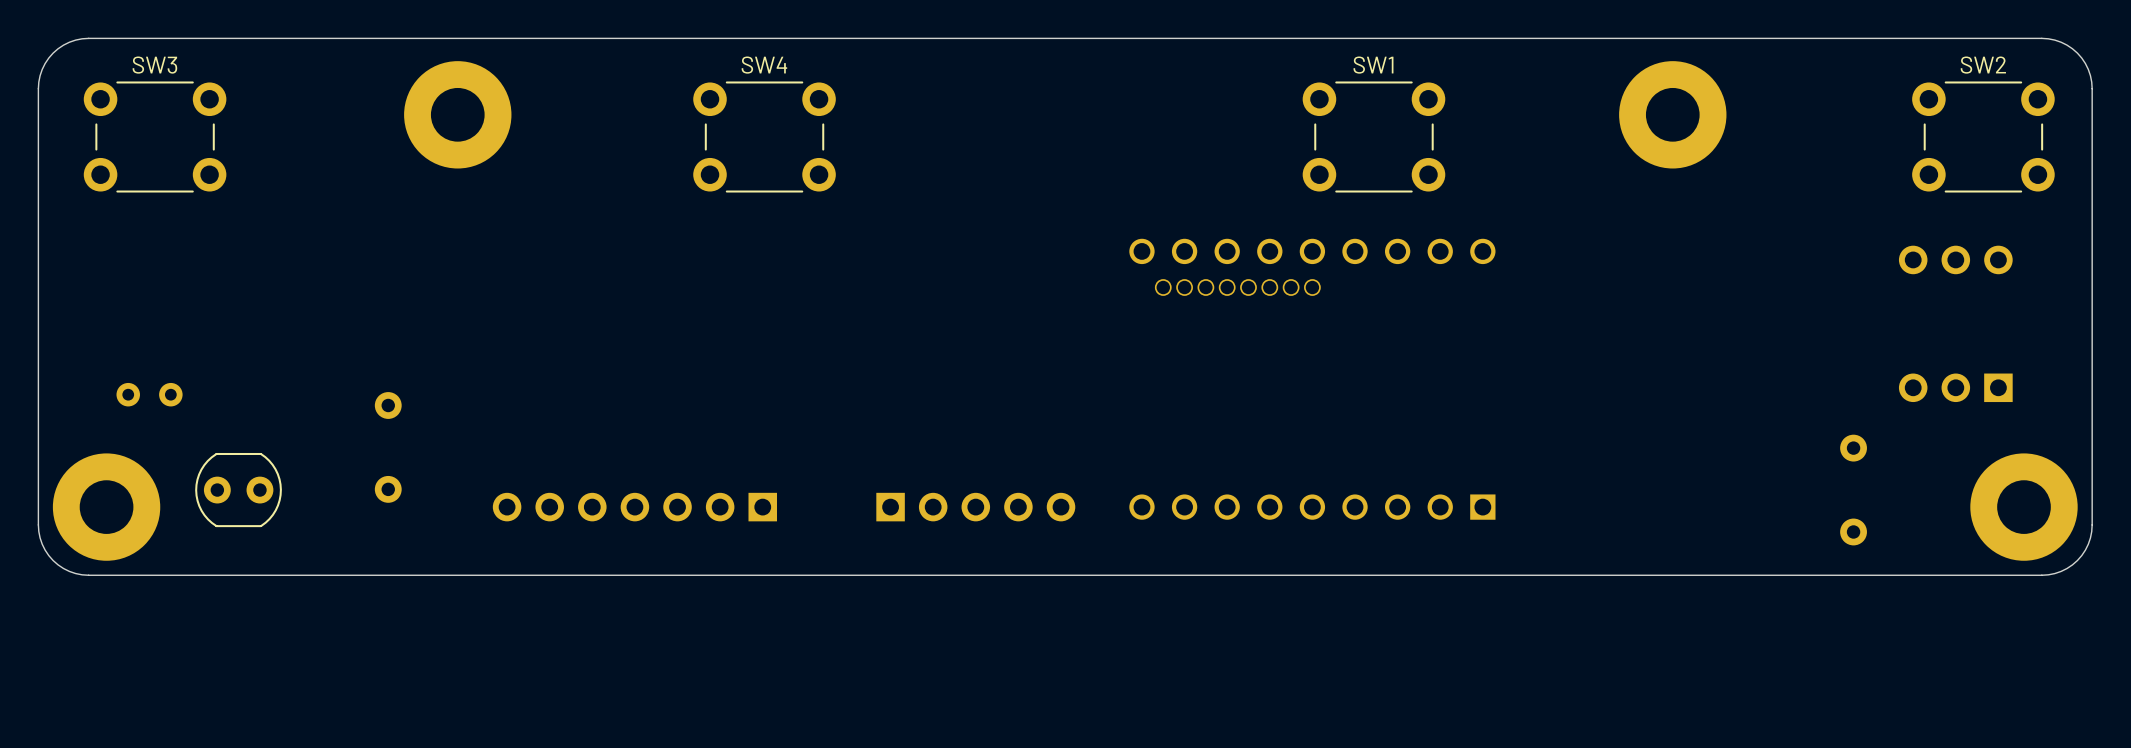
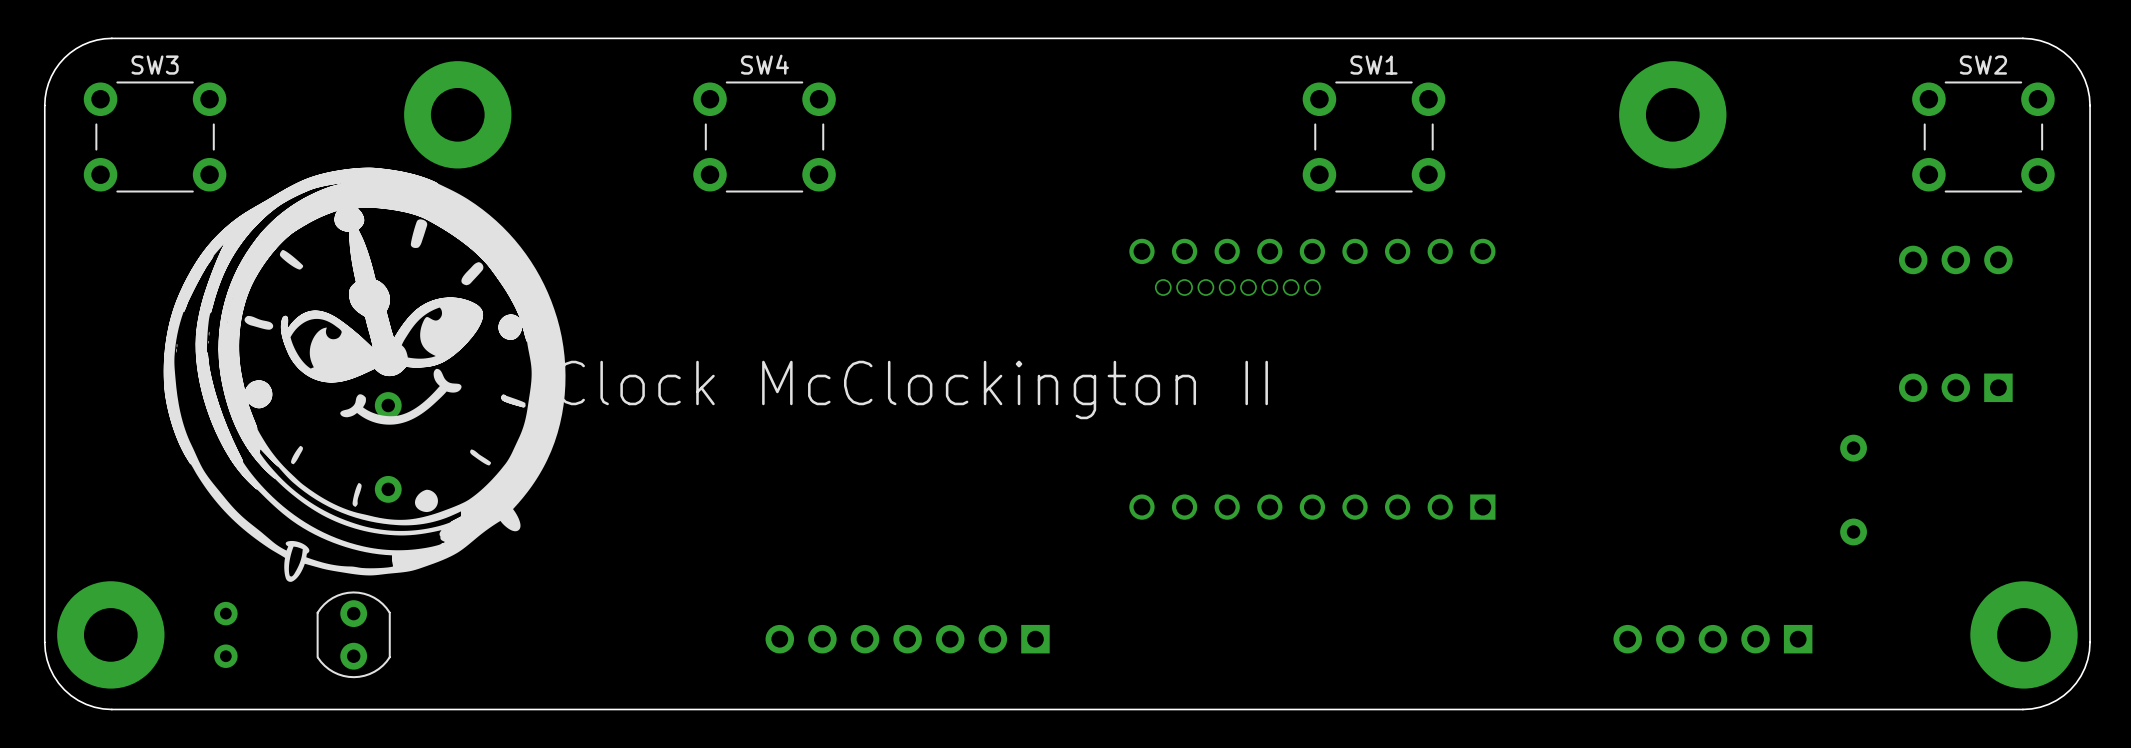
board edge: (2022, 38) (2054, 40) (2072, 48) (2081, 58) (2088, 69) (2092, 88) (2091, 531) (2088, 544) (2081, 555) (2072, 564) (2054, 573) (2041, 575) (88, 575) (75, 573) (58, 564) (45, 550) (38, 531) (38, 88) (42, 69) (48, 58) (58, 48) (69, 42) (82, 38) (111, 38) -> (2022, 38) (2048, 43) (2070, 58) (2084, 79) (2090, 105) (2089, 651) (2081, 675) (2063, 695) (2048, 704) (2022, 709) (111, 709) (86, 704) (71, 695) (58, 683) (49, 668) (45, 651) (44, 105) (48, 83) (55, 69) (64, 58) (76, 48) (89, 42) (111, 38)
drawing: none -> [163, 167, 566, 582]
text: none -> Clock McClockington II (912, 389)
part rotation: 0° (149, 394) -> 90° clockwise (225, 634)
part position: (149, 394) -> (225, 634)
part rotation: 0° (238, 490) -> 90° clockwise (353, 634)
part position: (238, 490) -> (353, 634)
part position: (106, 507) -> (110, 634)
part position: (634, 507) -> (907, 639)
part: (975, 507) -> none
part position: (2023, 507) -> (2023, 634)
part: none -> (1712, 639)

